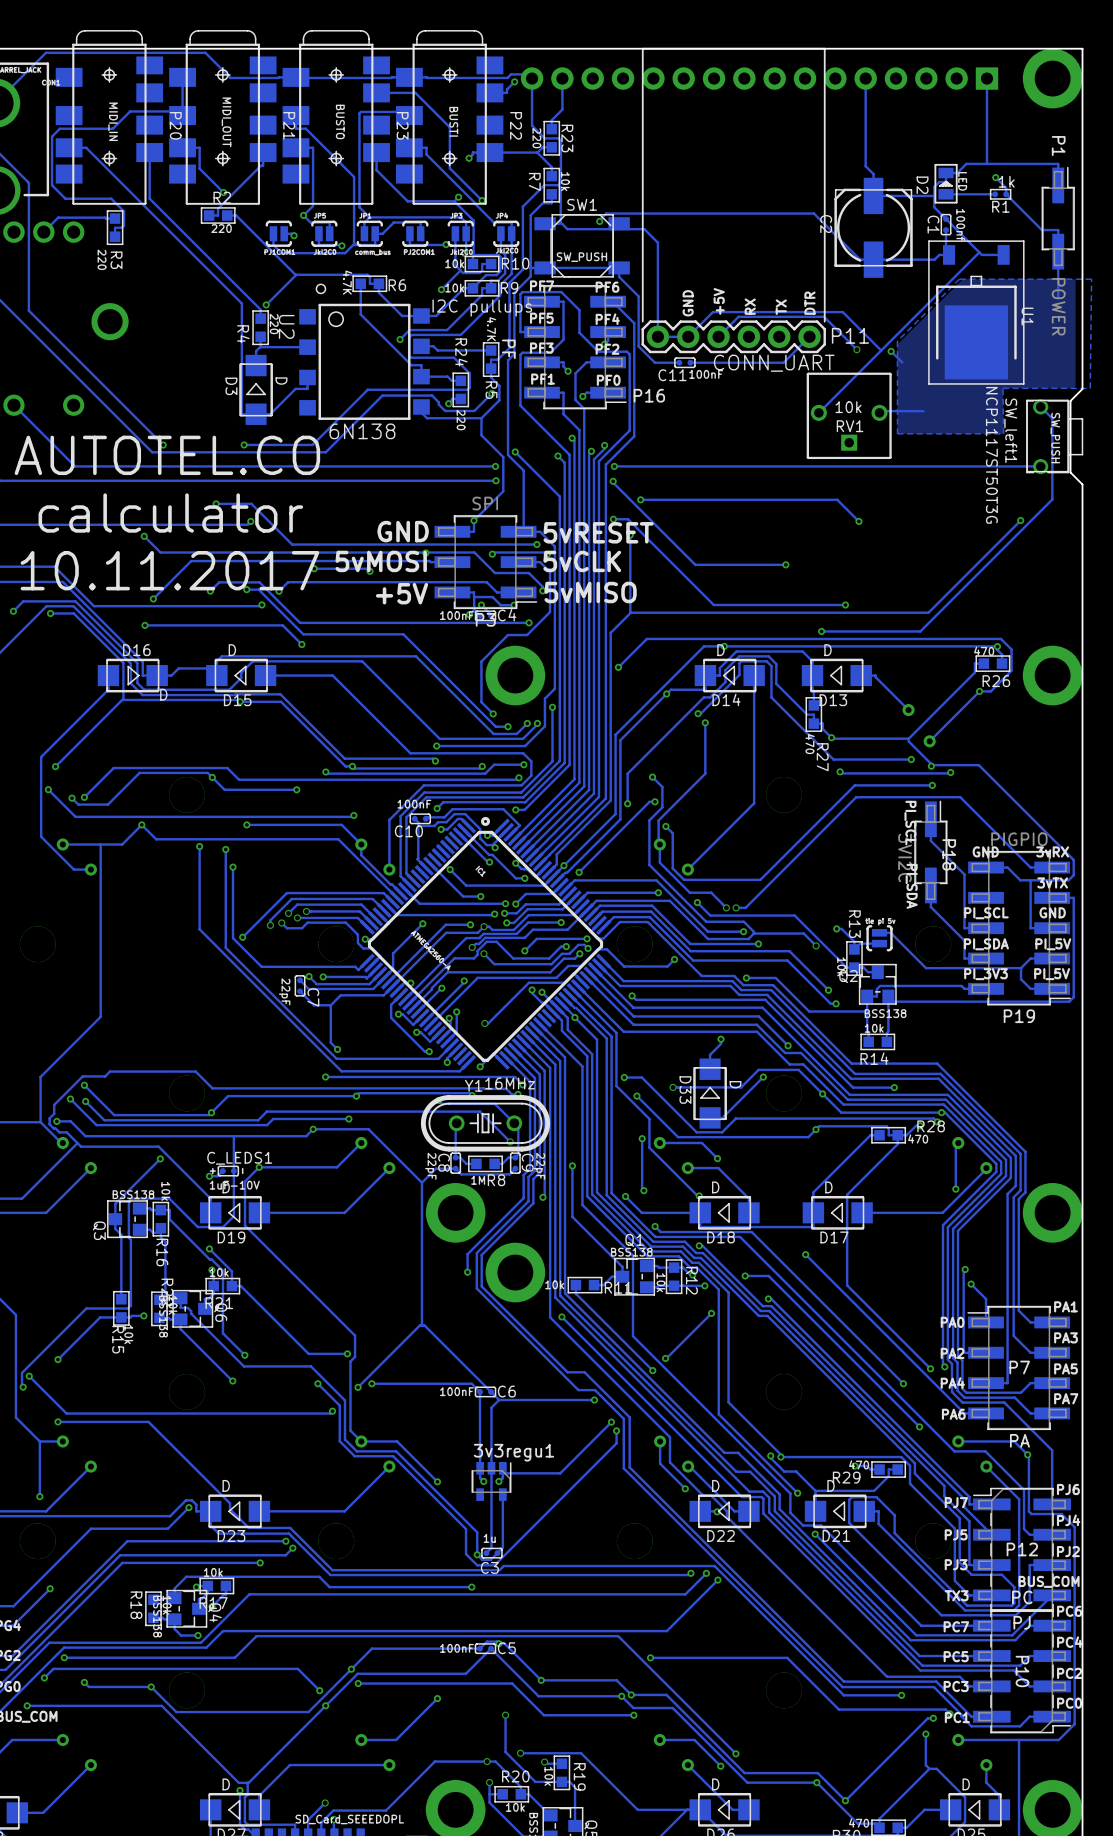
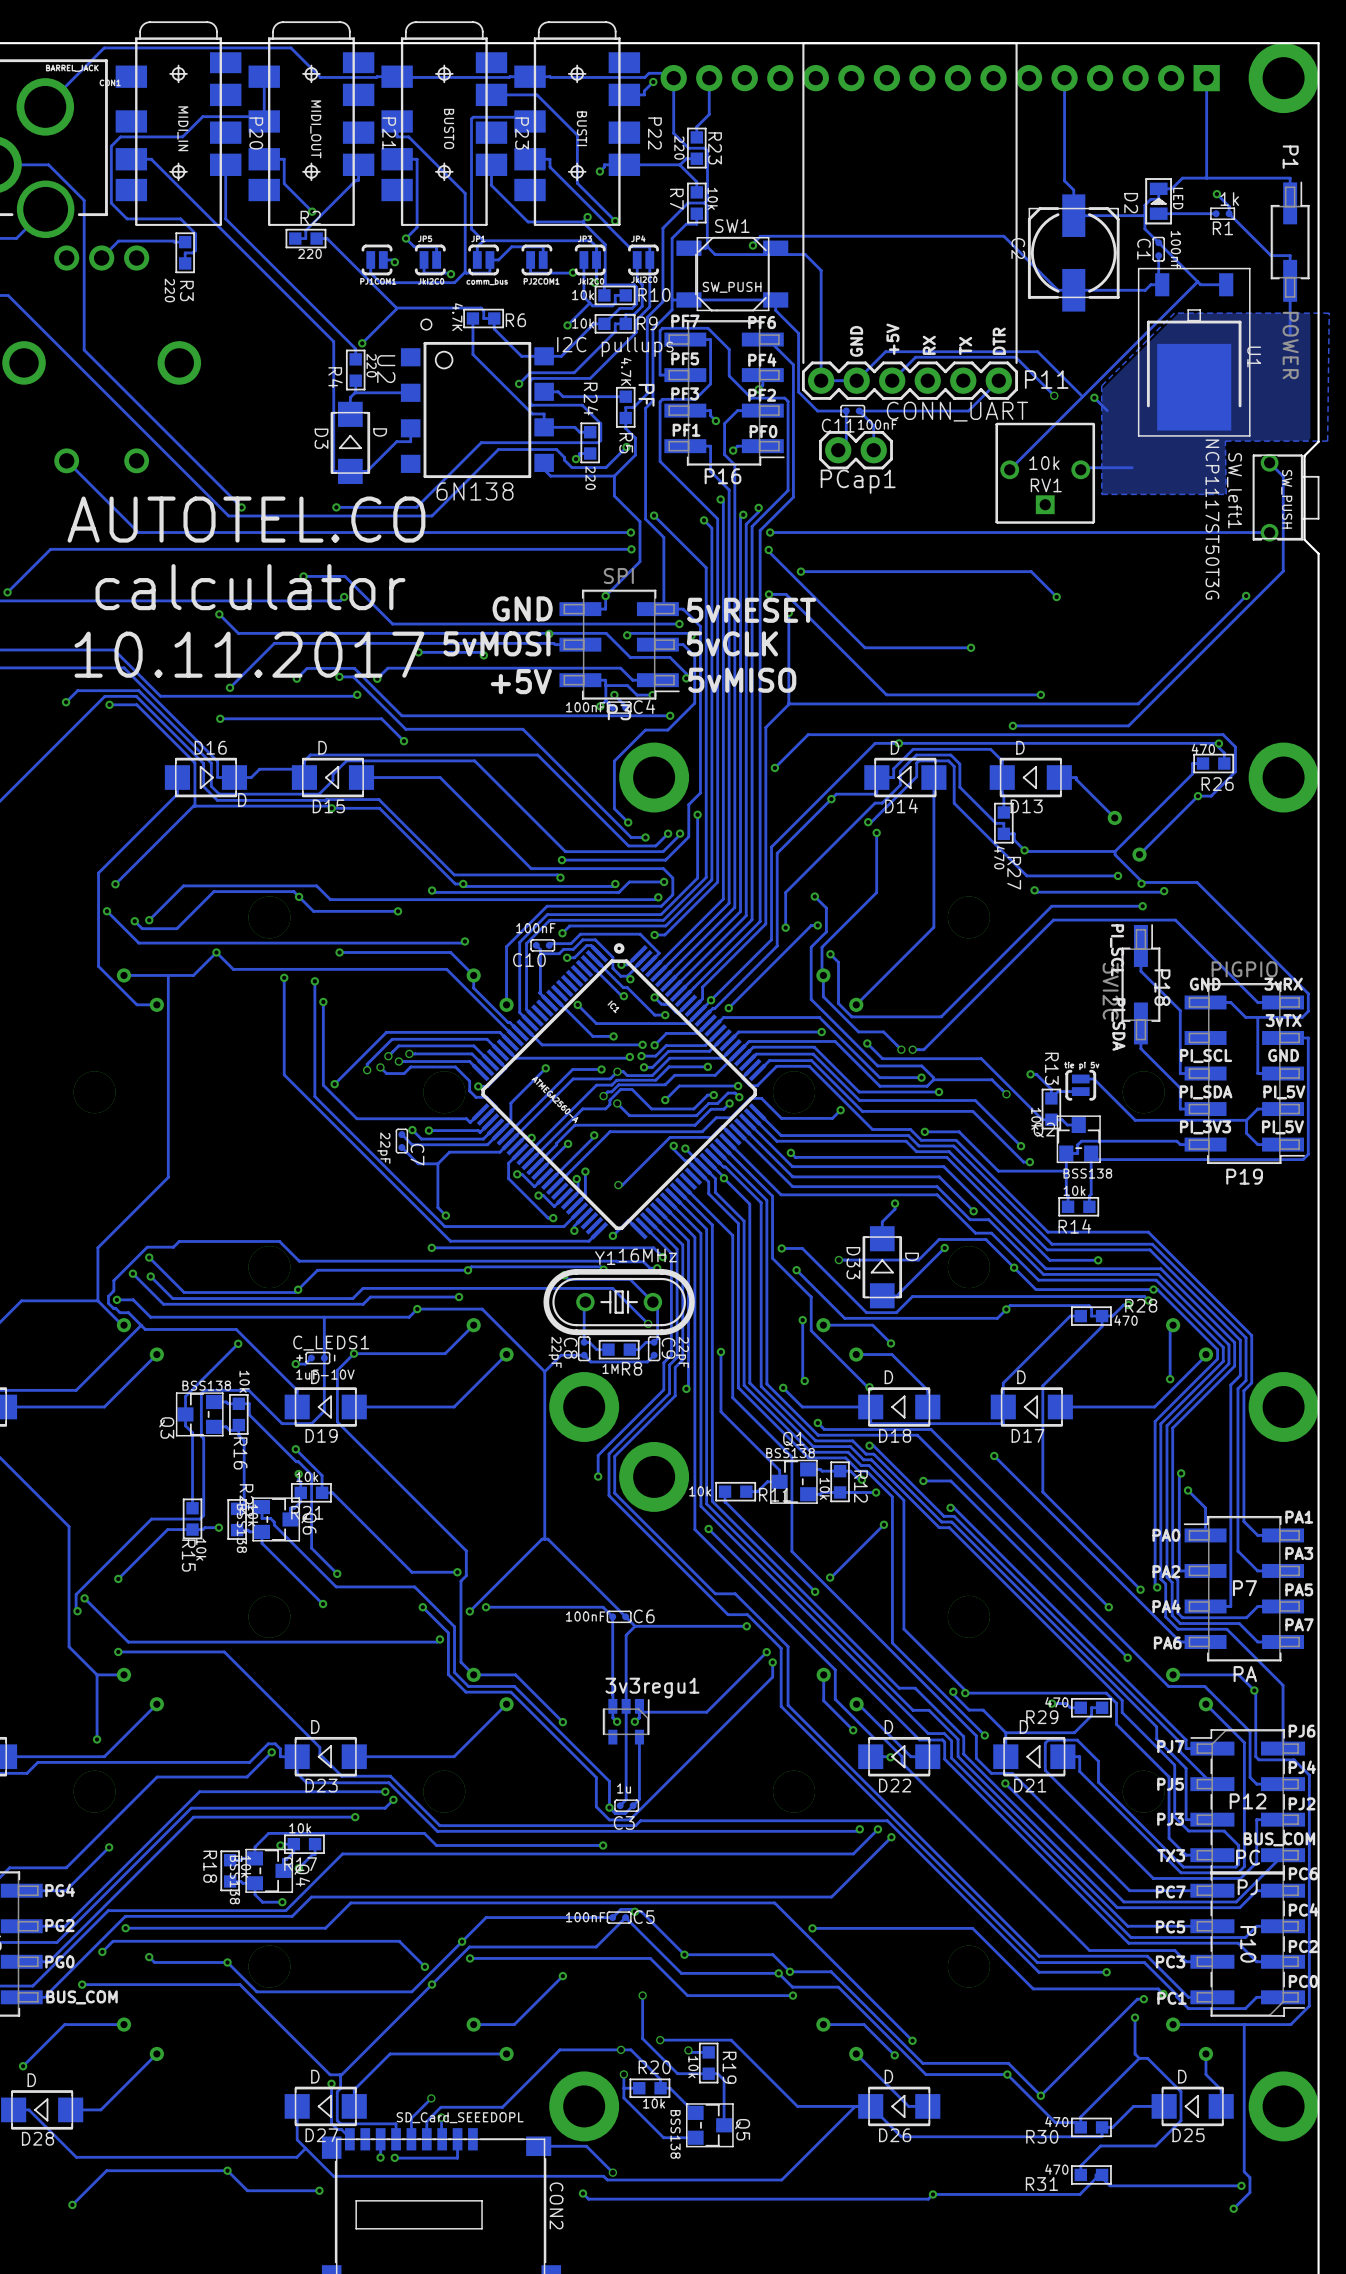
track: none -> (846, 411) (846, 442) (838, 450)
track: none -> (859, 411) (873, 425) (873, 450)
P16 name position: P16 (649, 395) -> P16 (723, 476)
PCap1: none -> (855, 450)

